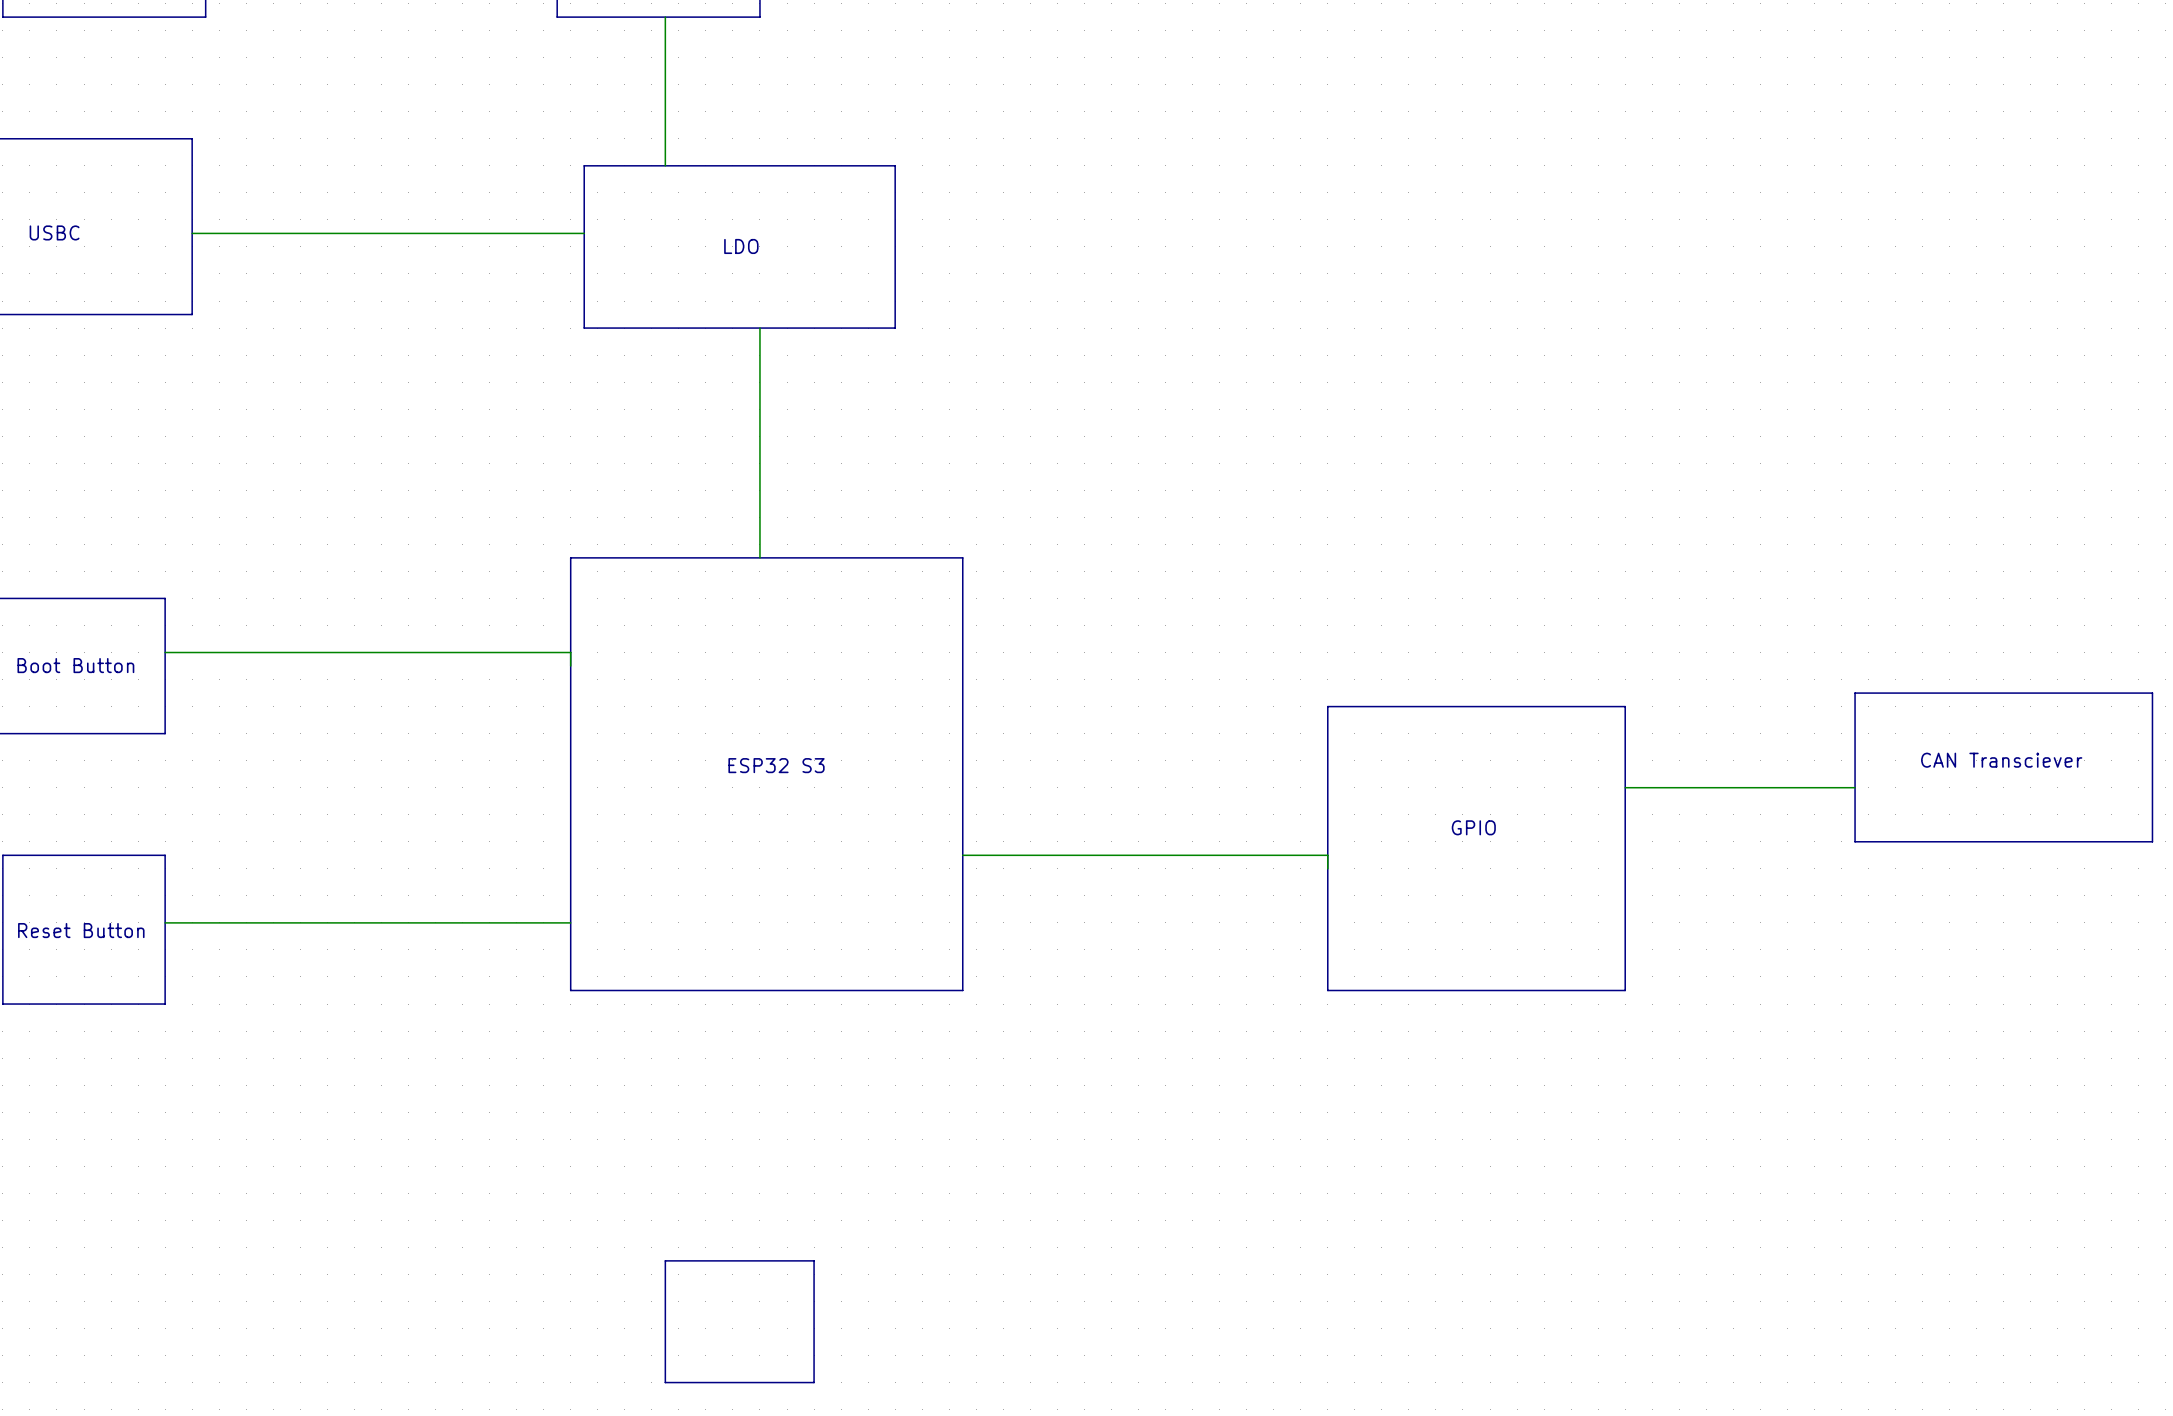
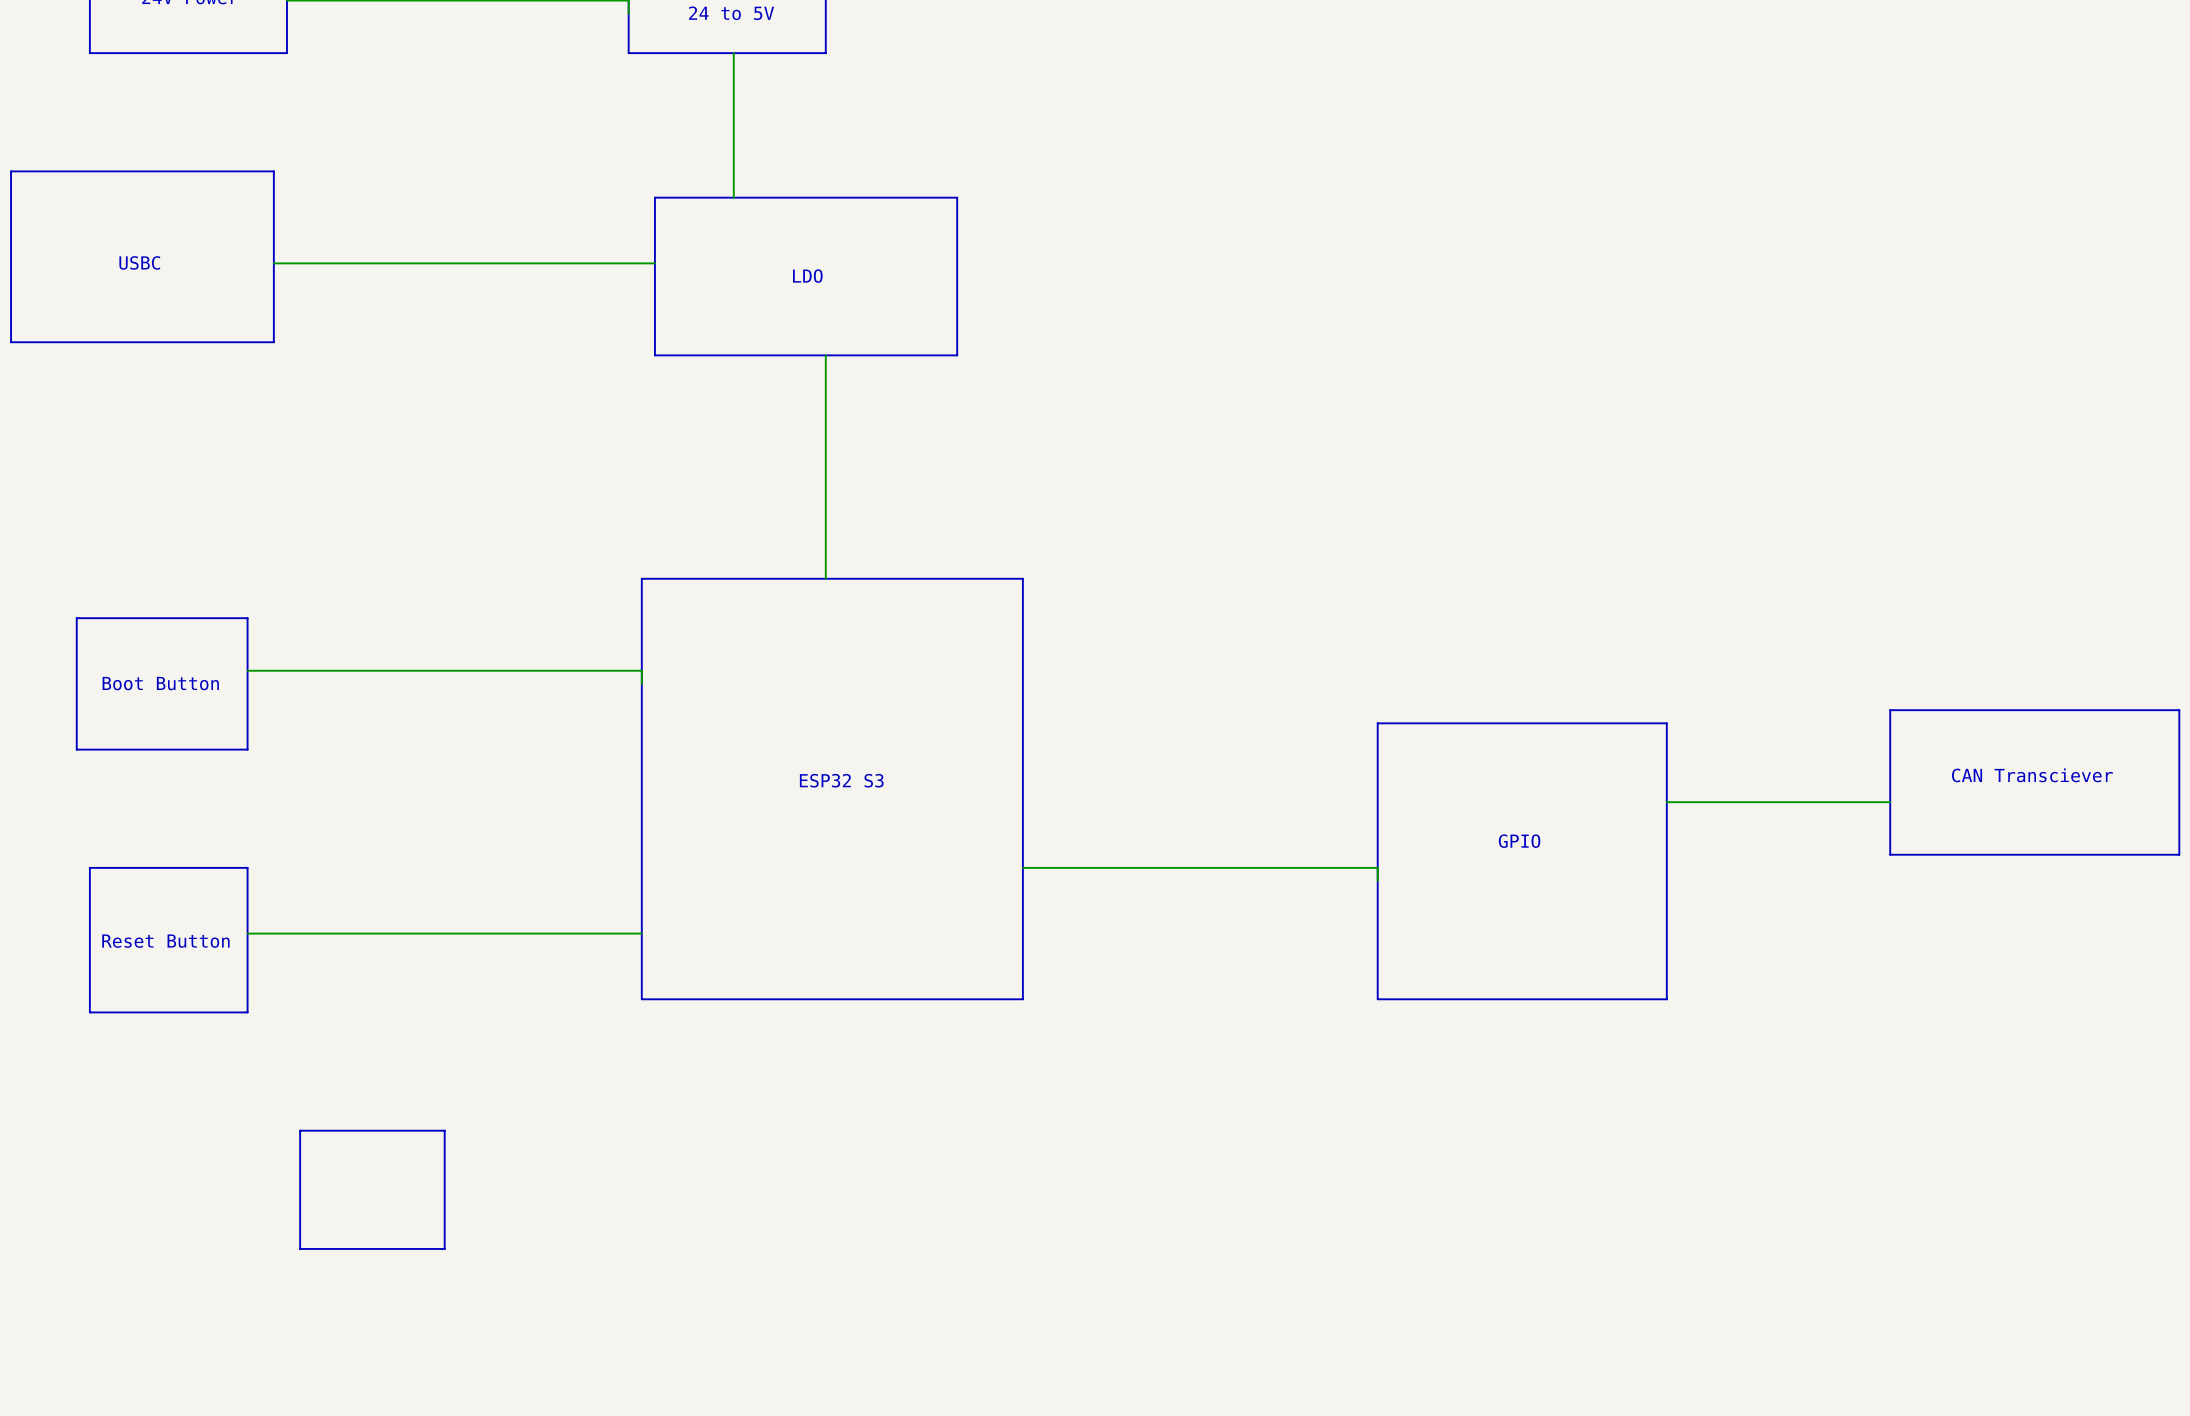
line: none -> (300, 1130) (444, 1130) (444, 1248) (300, 1248) (300, 1130)
line: (665, 1260) (814, 1260) (814, 1382) (665, 1382) (665, 1260) -> none

